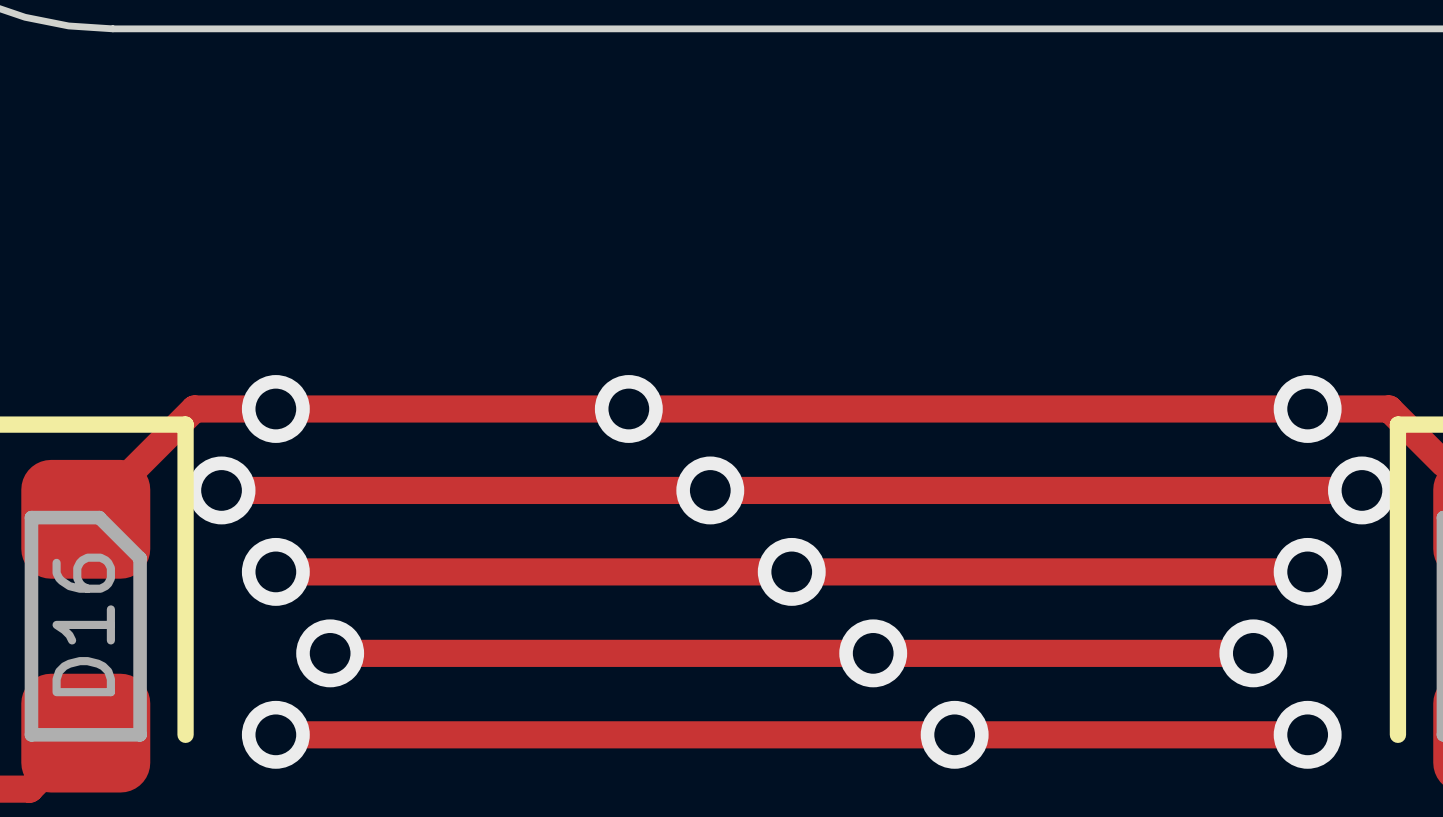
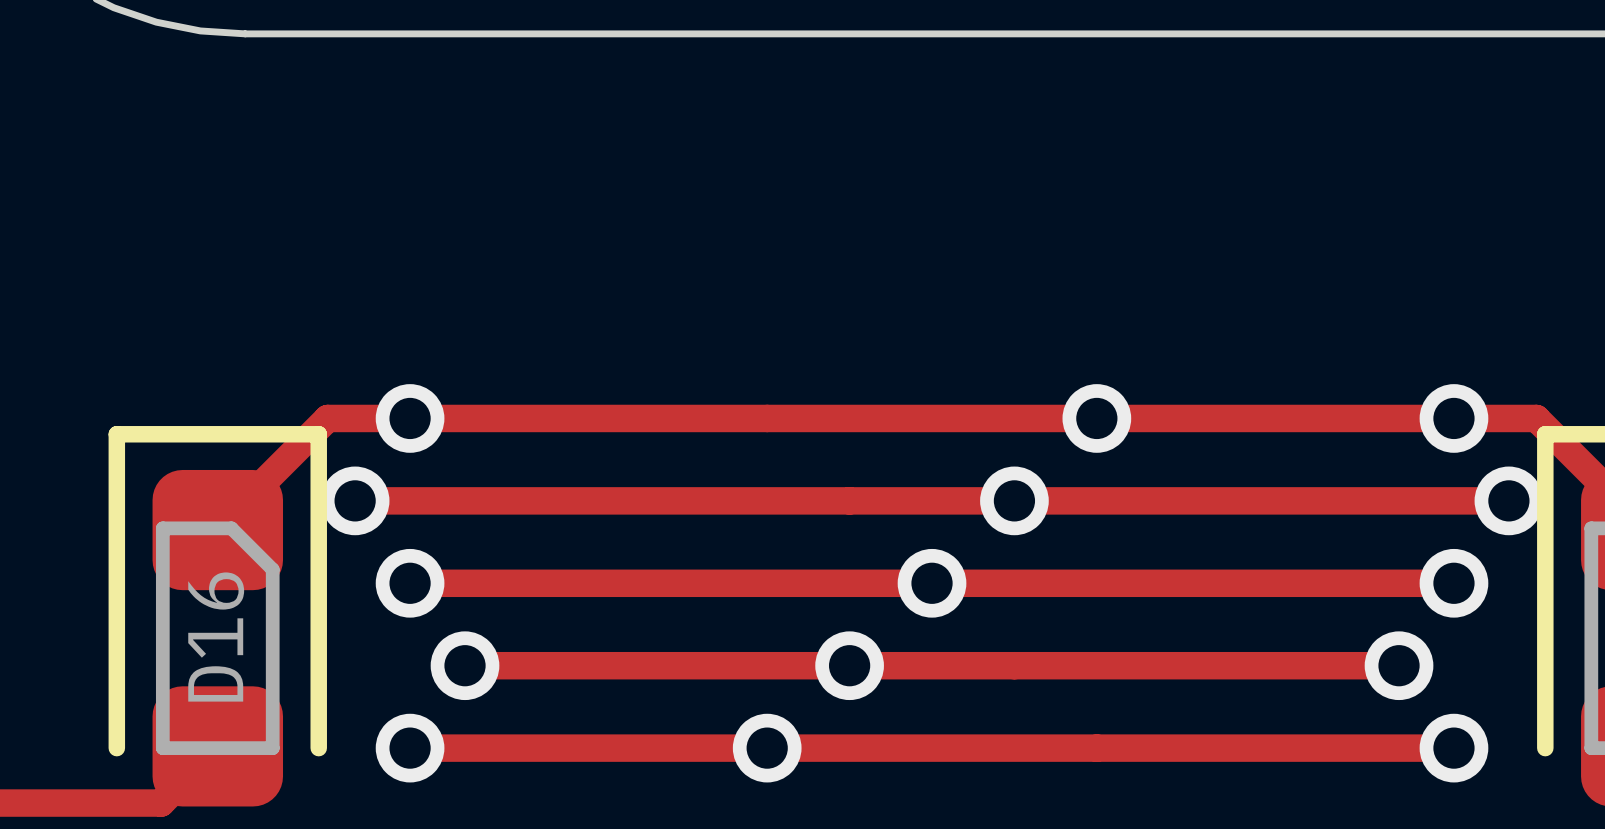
via: (628, 408) -> none
via: none -> (1096, 418)
via: (710, 490) -> none
via: none -> (1014, 500)
via: none -> (849, 665)
via: (873, 653) -> none
via: none -> (767, 748)
via: (954, 734) -> none

